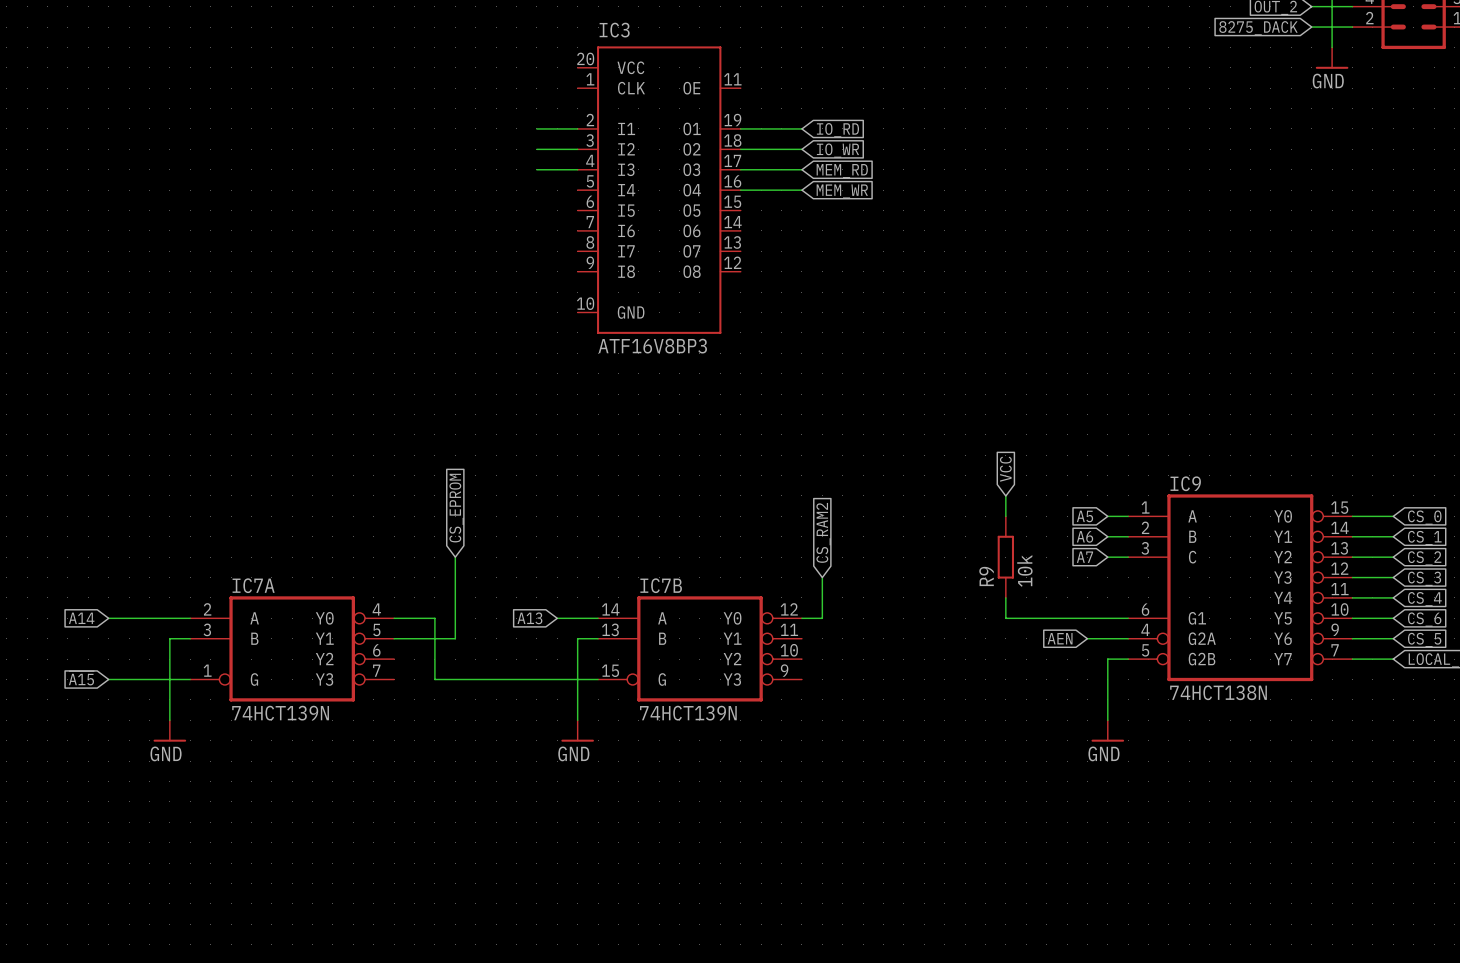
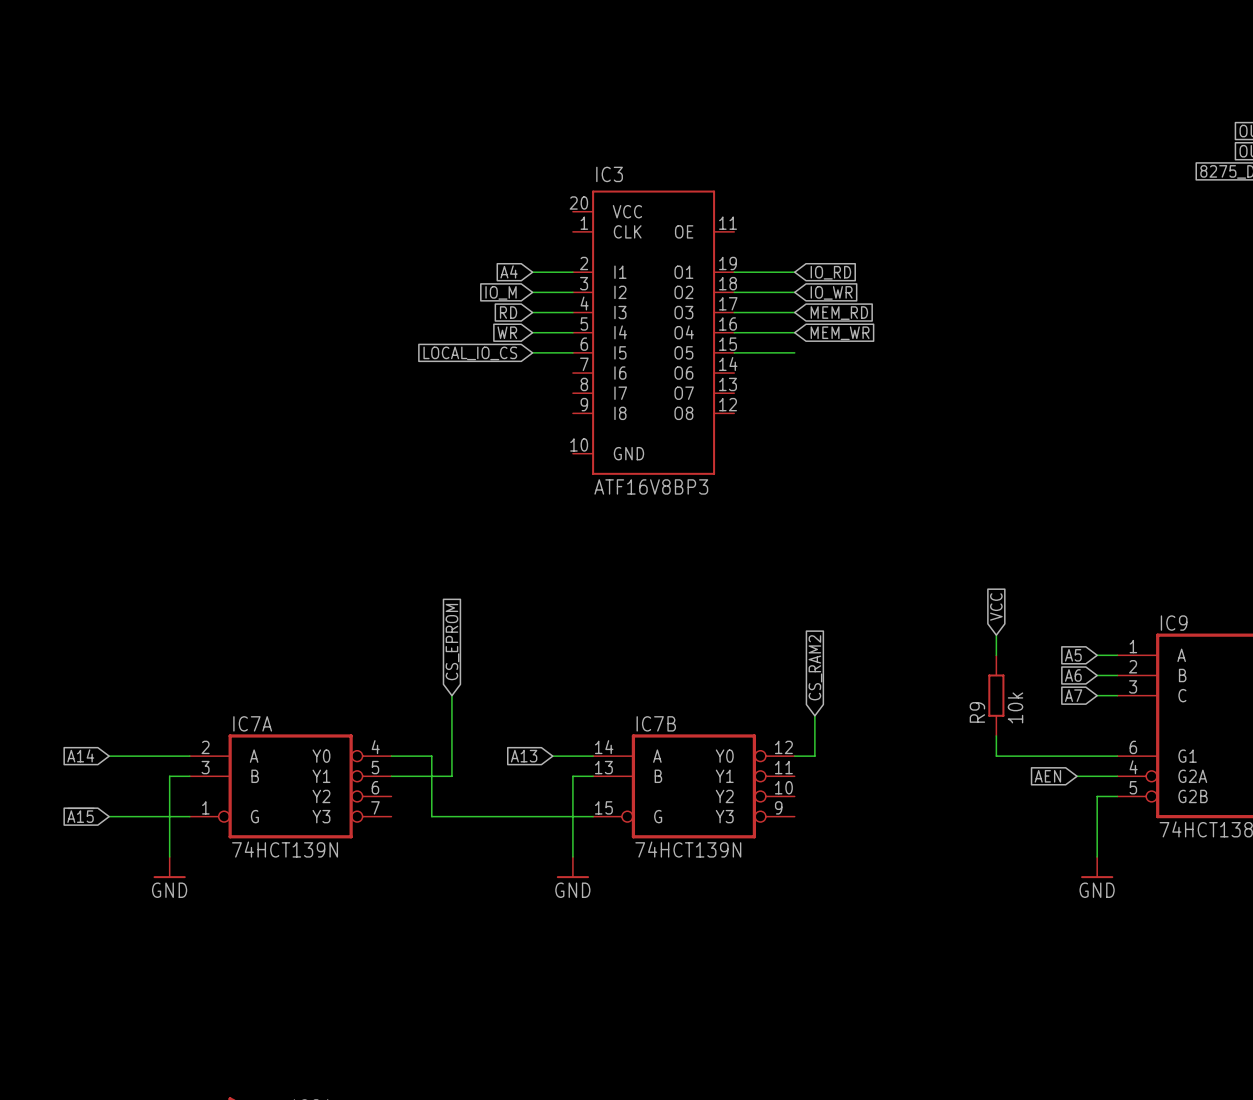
global label: none -> A4 (509, 271)
global label: none -> IO_M (501, 292)
global label: none -> RD (508, 312)
global label: none -> WR (507, 332)
wire: none -> (532, 332) (572, 332)
wire: none -> (532, 352) (572, 352)
wire: none -> (734, 352) (794, 352)
global label: none -> LOCAL_IO_CS (470, 353)

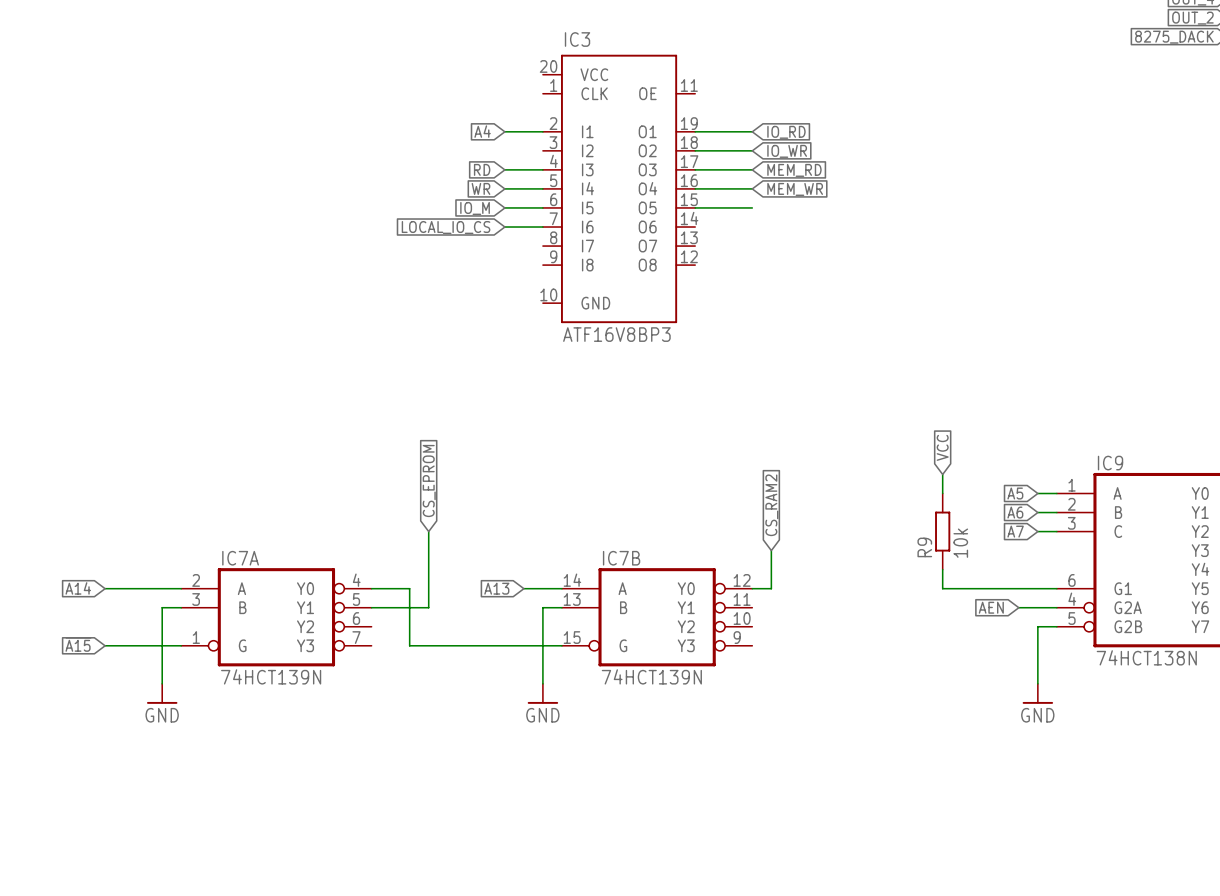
global label: IO_M (501, 292) -> none
wire: (532, 292) (572, 292) -> (504, 227) (542, 227)
global label: LOCAL_IO_CS (470, 353) -> IO_M (475, 208)
global label: none -> LOCAL_IO_CS (446, 227)

